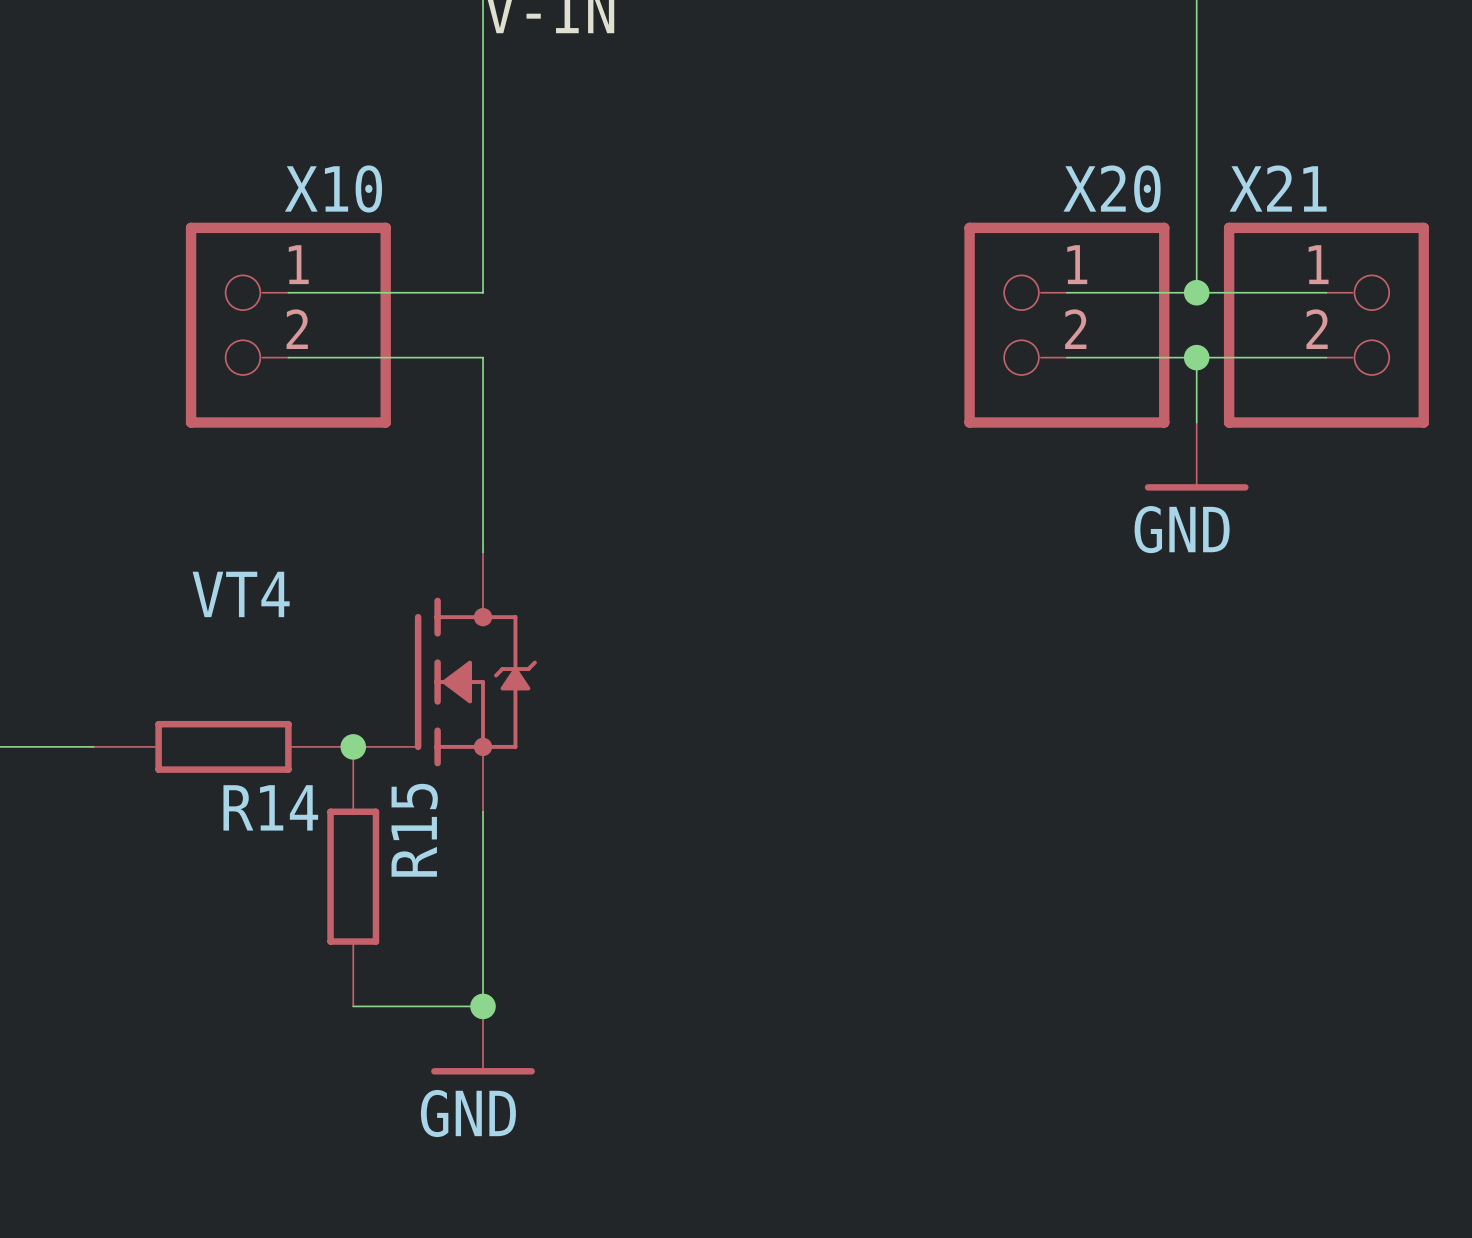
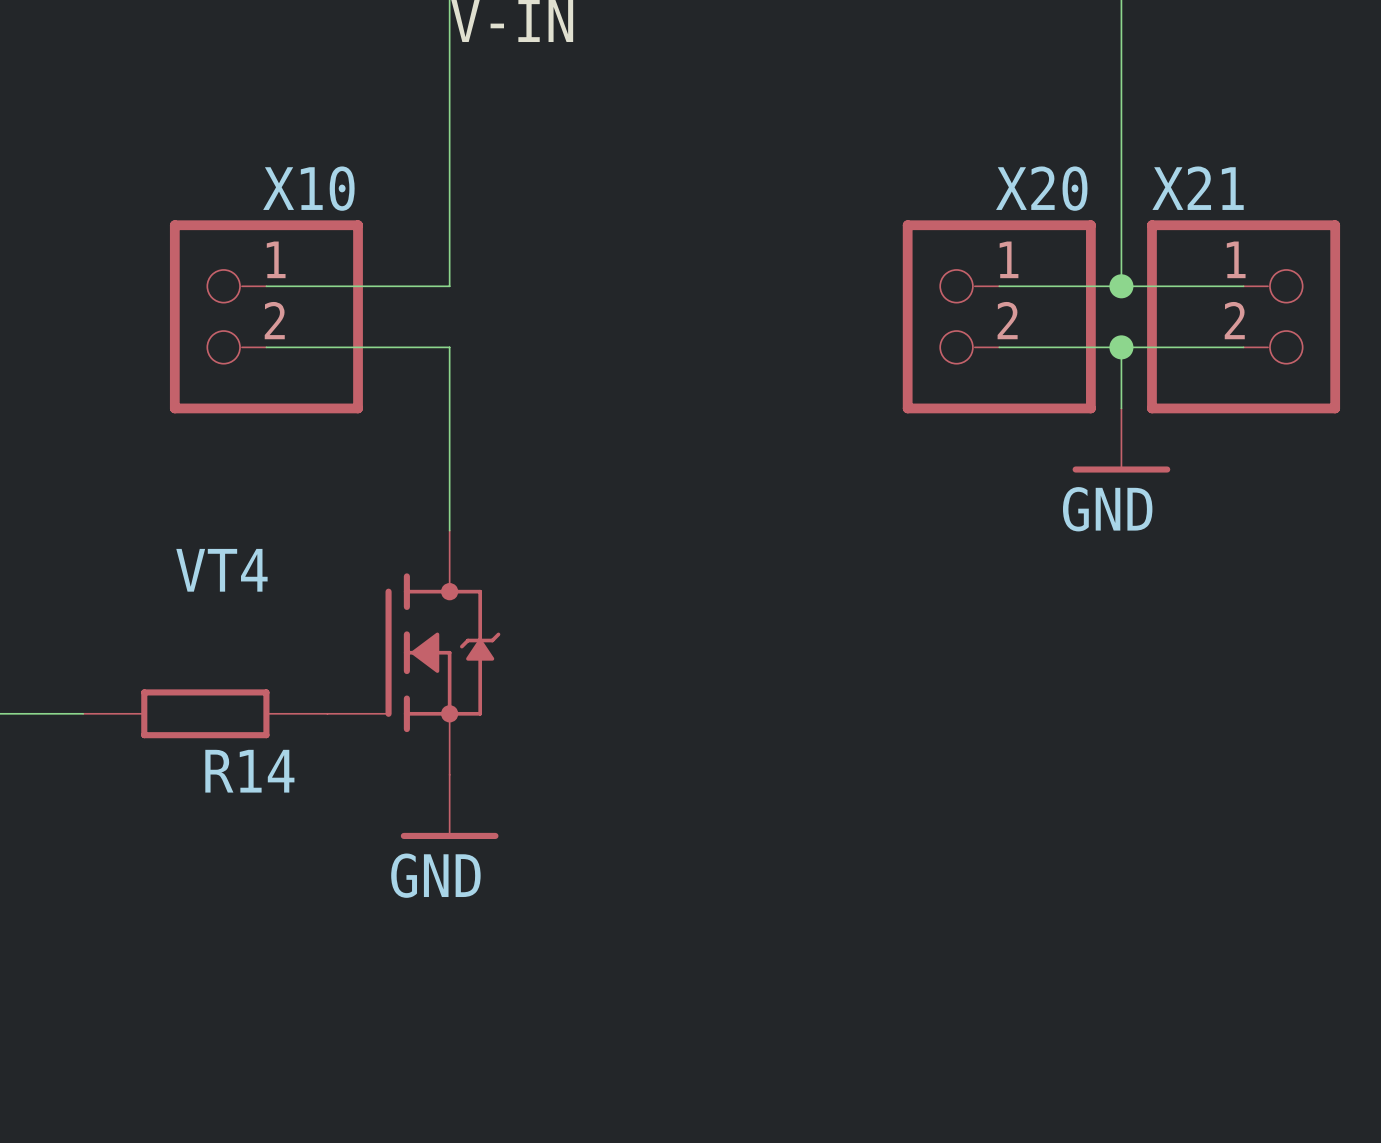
junction: (353, 746) -> none
wire: (483, 811) (483, 1006) (353, 1006) -> none
R15: (353, 876) -> none
junction: (483, 1006) -> none
power symbol position: GND (483, 1040) -> GND (449, 806)

